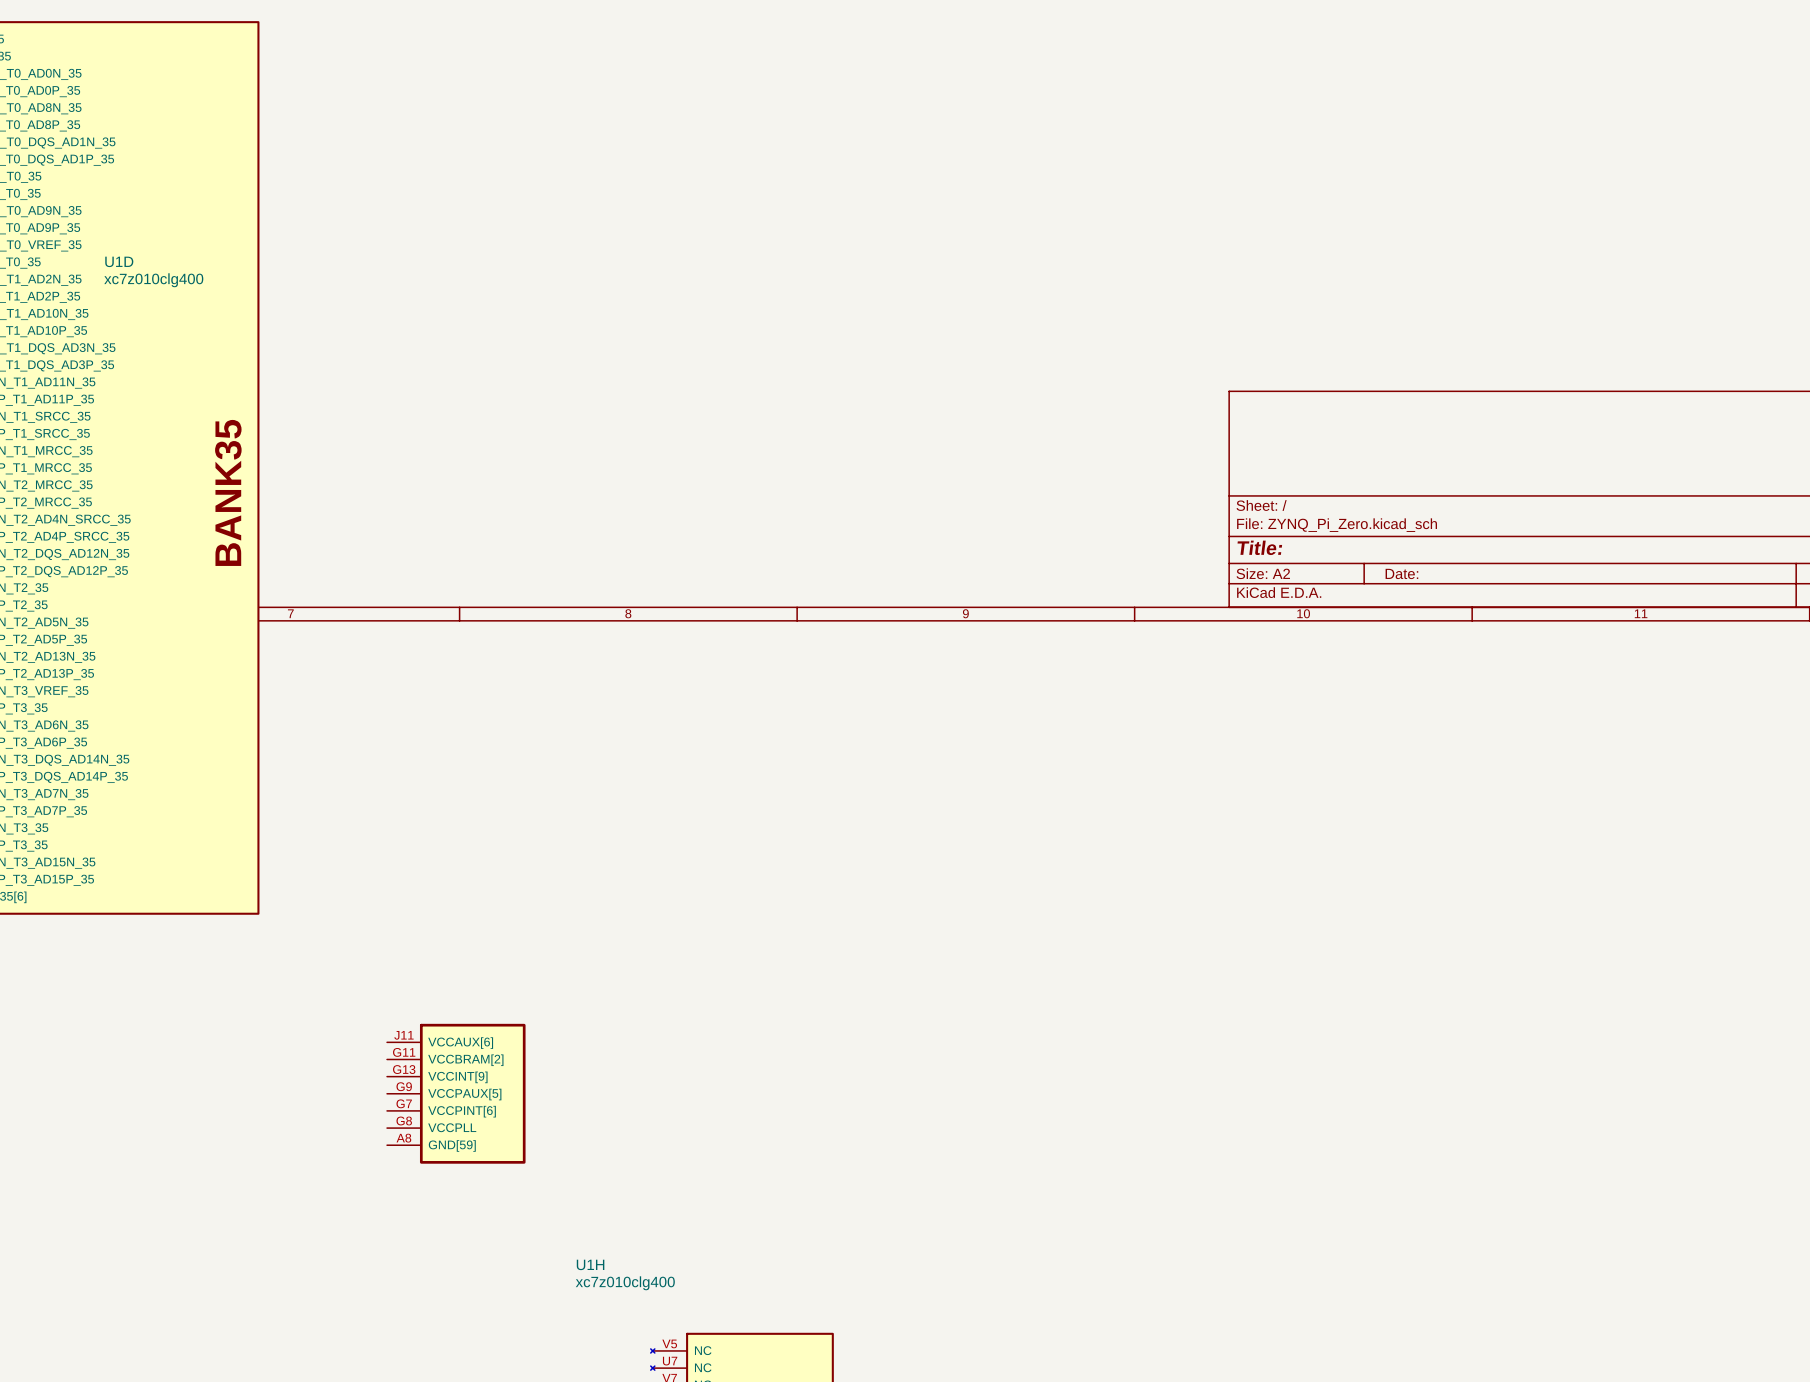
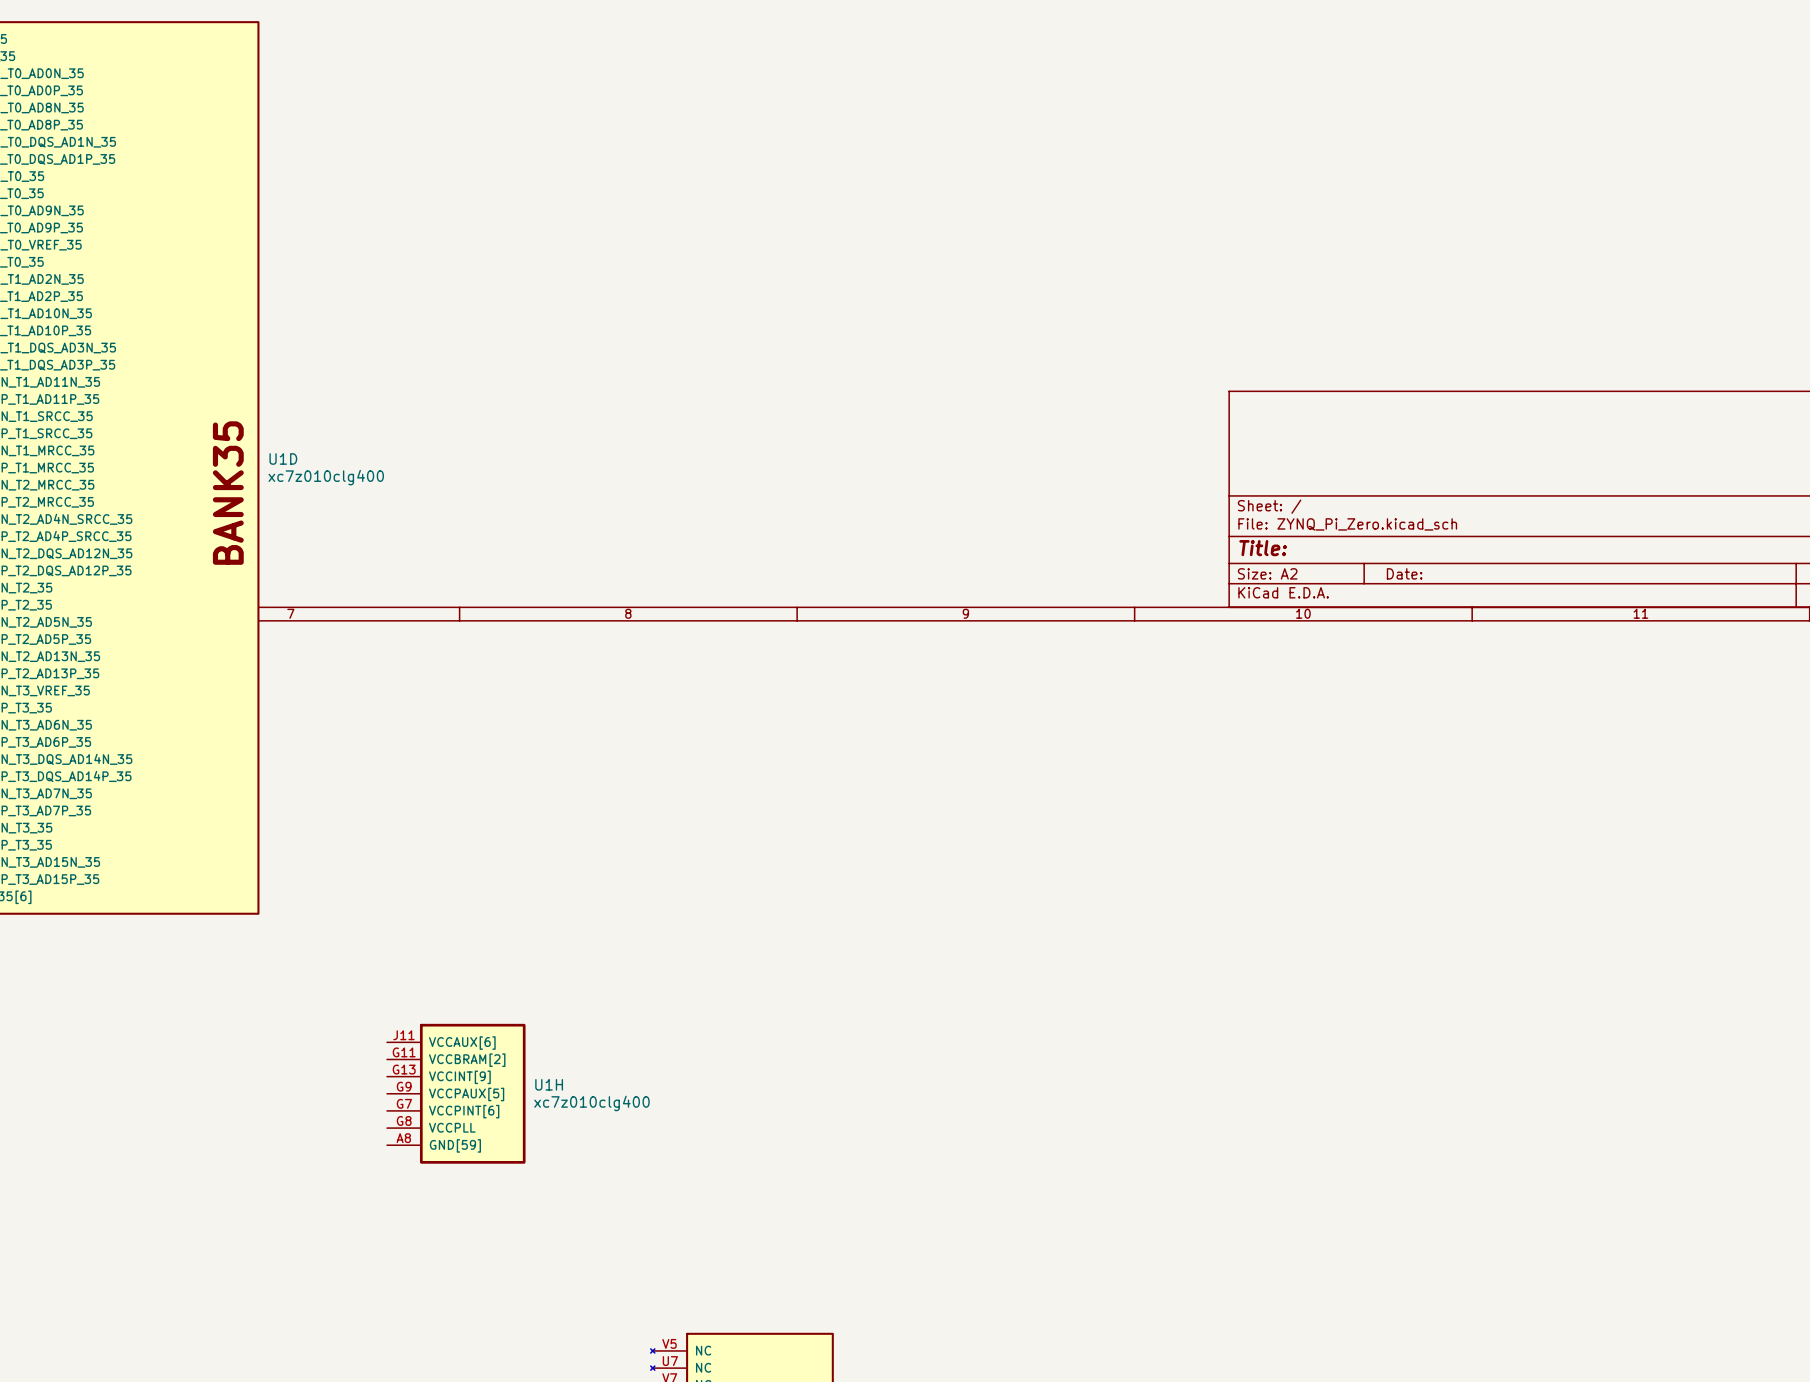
U1D name position: U1D (119, 261) -> U1D (283, 458)
U1D value position: xc7z010clg400 (153, 280) -> xc7z010clg400 (326, 477)
U1H name position: U1H (590, 1264) -> U1H (549, 1084)
U1H value position: xc7z010clg400 (625, 1283) -> xc7z010clg400 (591, 1103)

